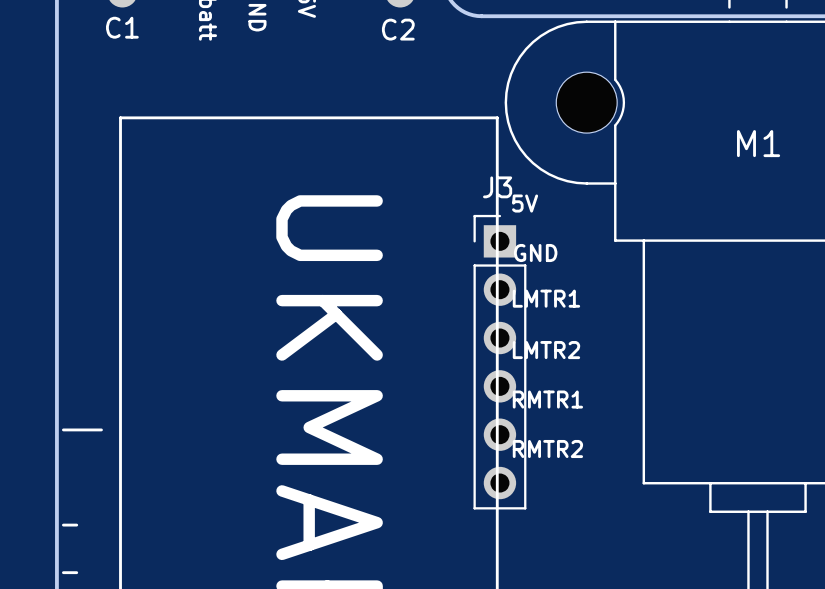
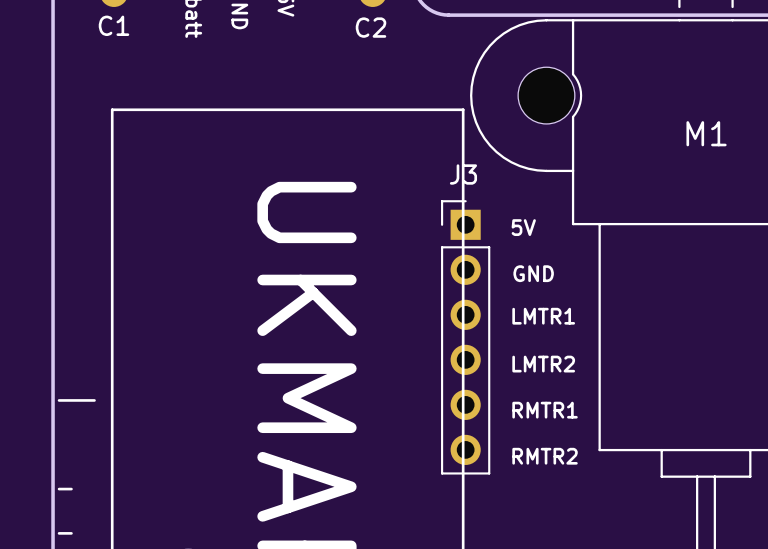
text position: 5V (525, 203) -> 5V (523, 227)
text position: GND (535, 253) -> GND (533, 273)
text position: LMTR1 (546, 298) -> LMTR1 (543, 316)
text position: LMTR2 (546, 350) -> LMTR2 (543, 364)
text position: RMTR1 (547, 399) -> RMTR1 (545, 410)
text position: RMTR2 (547, 449) -> RMTR2 (545, 456)

